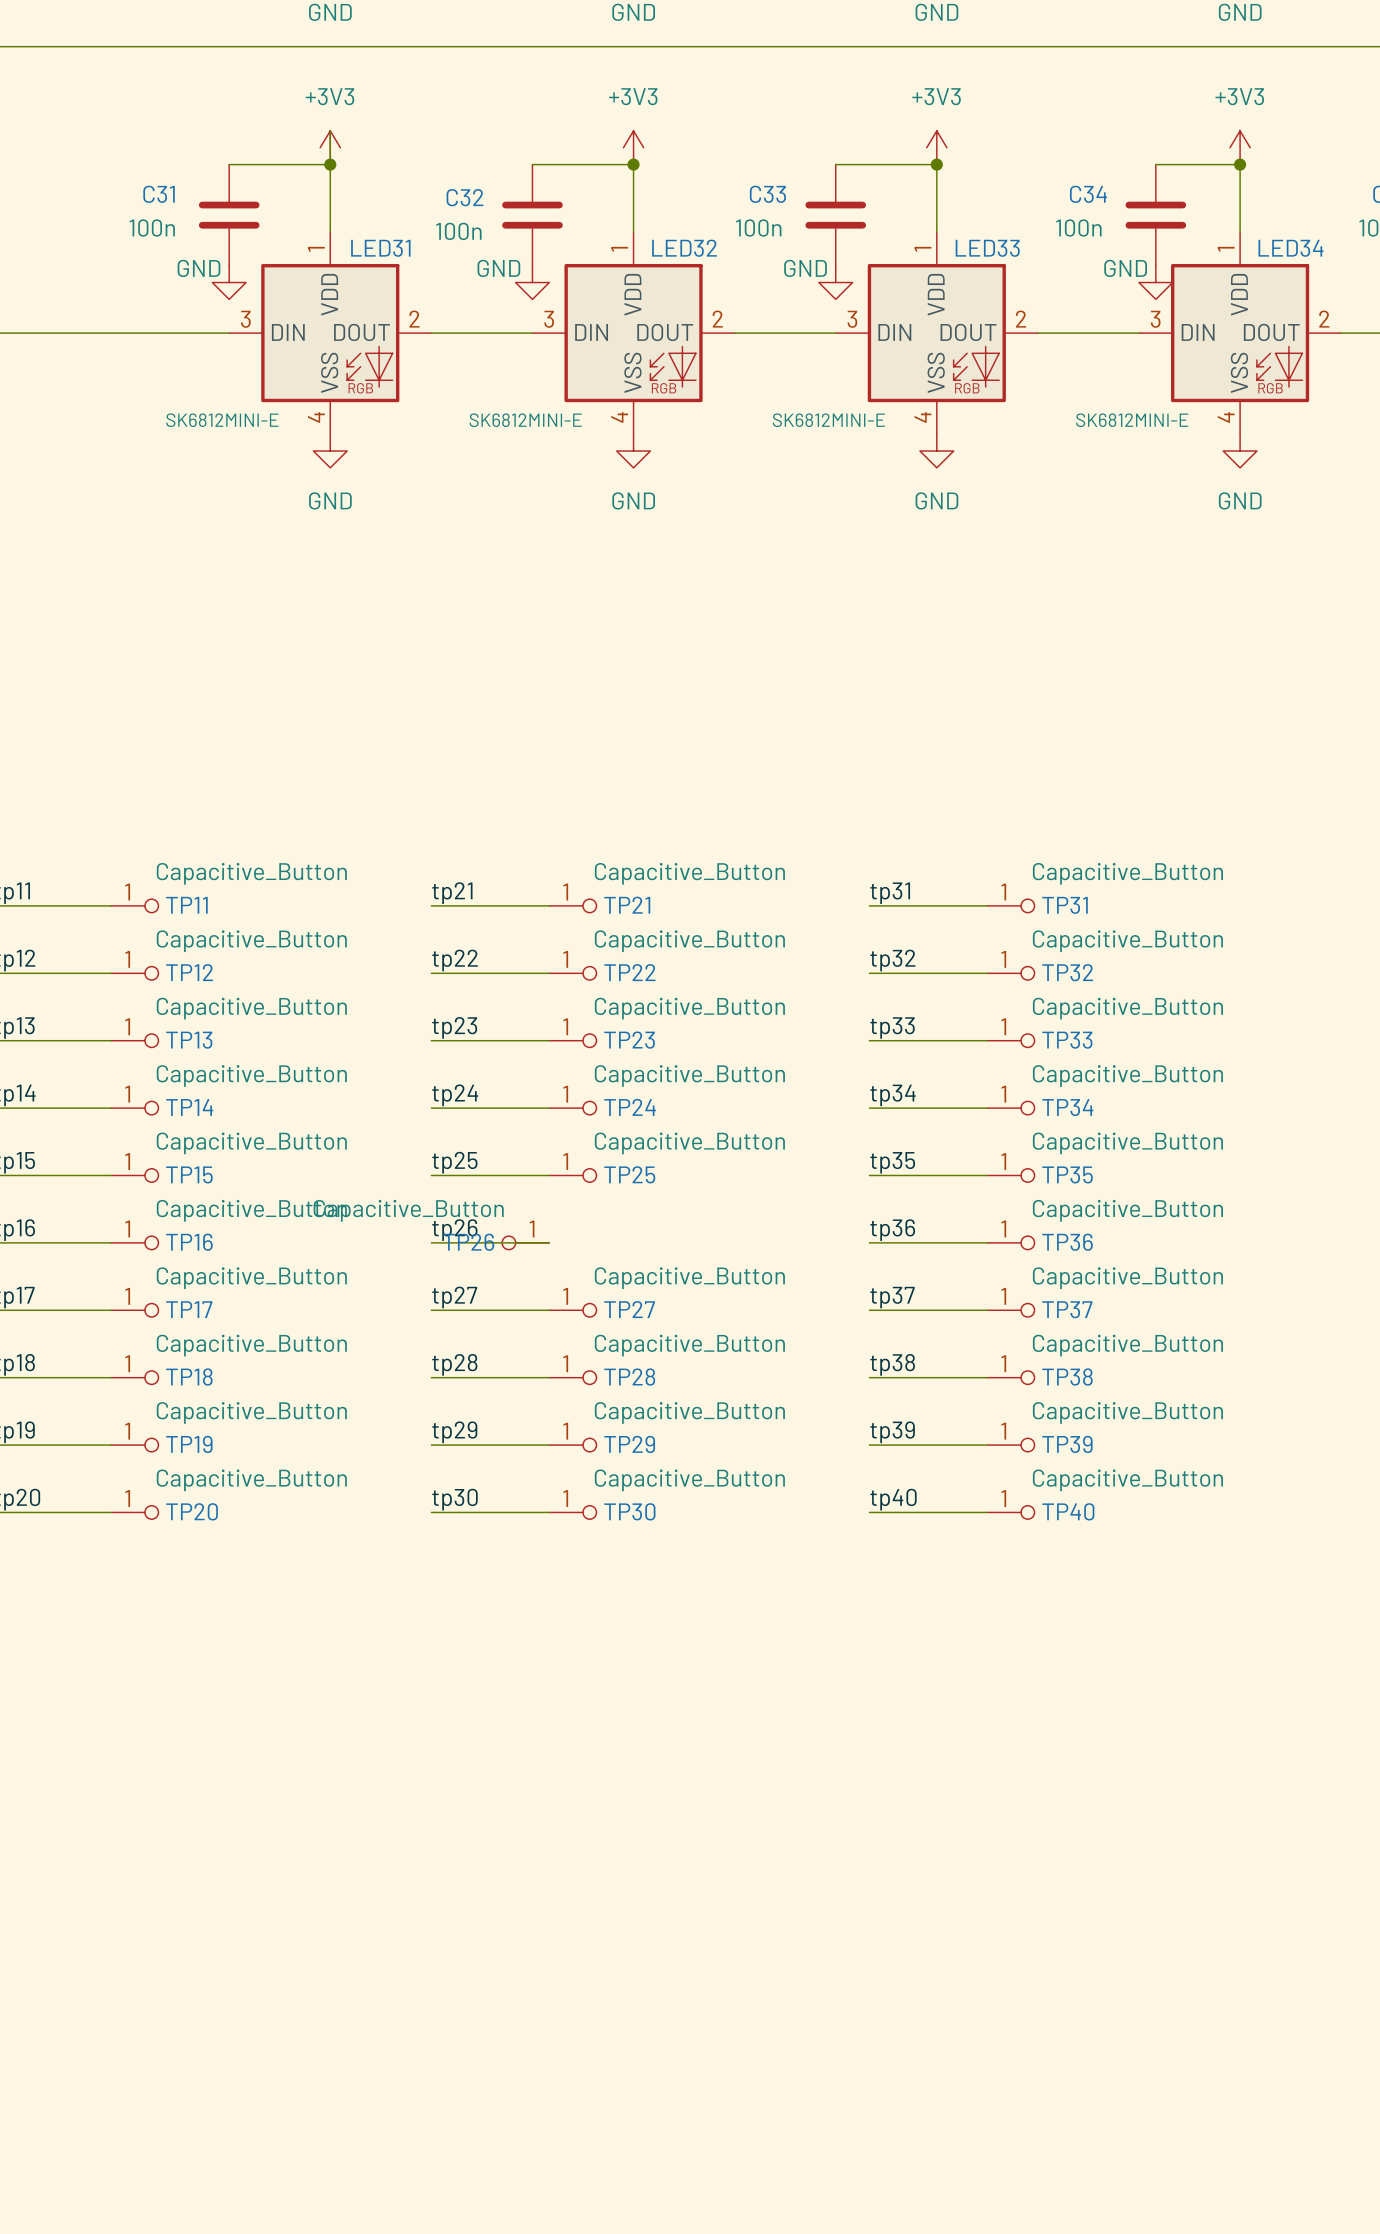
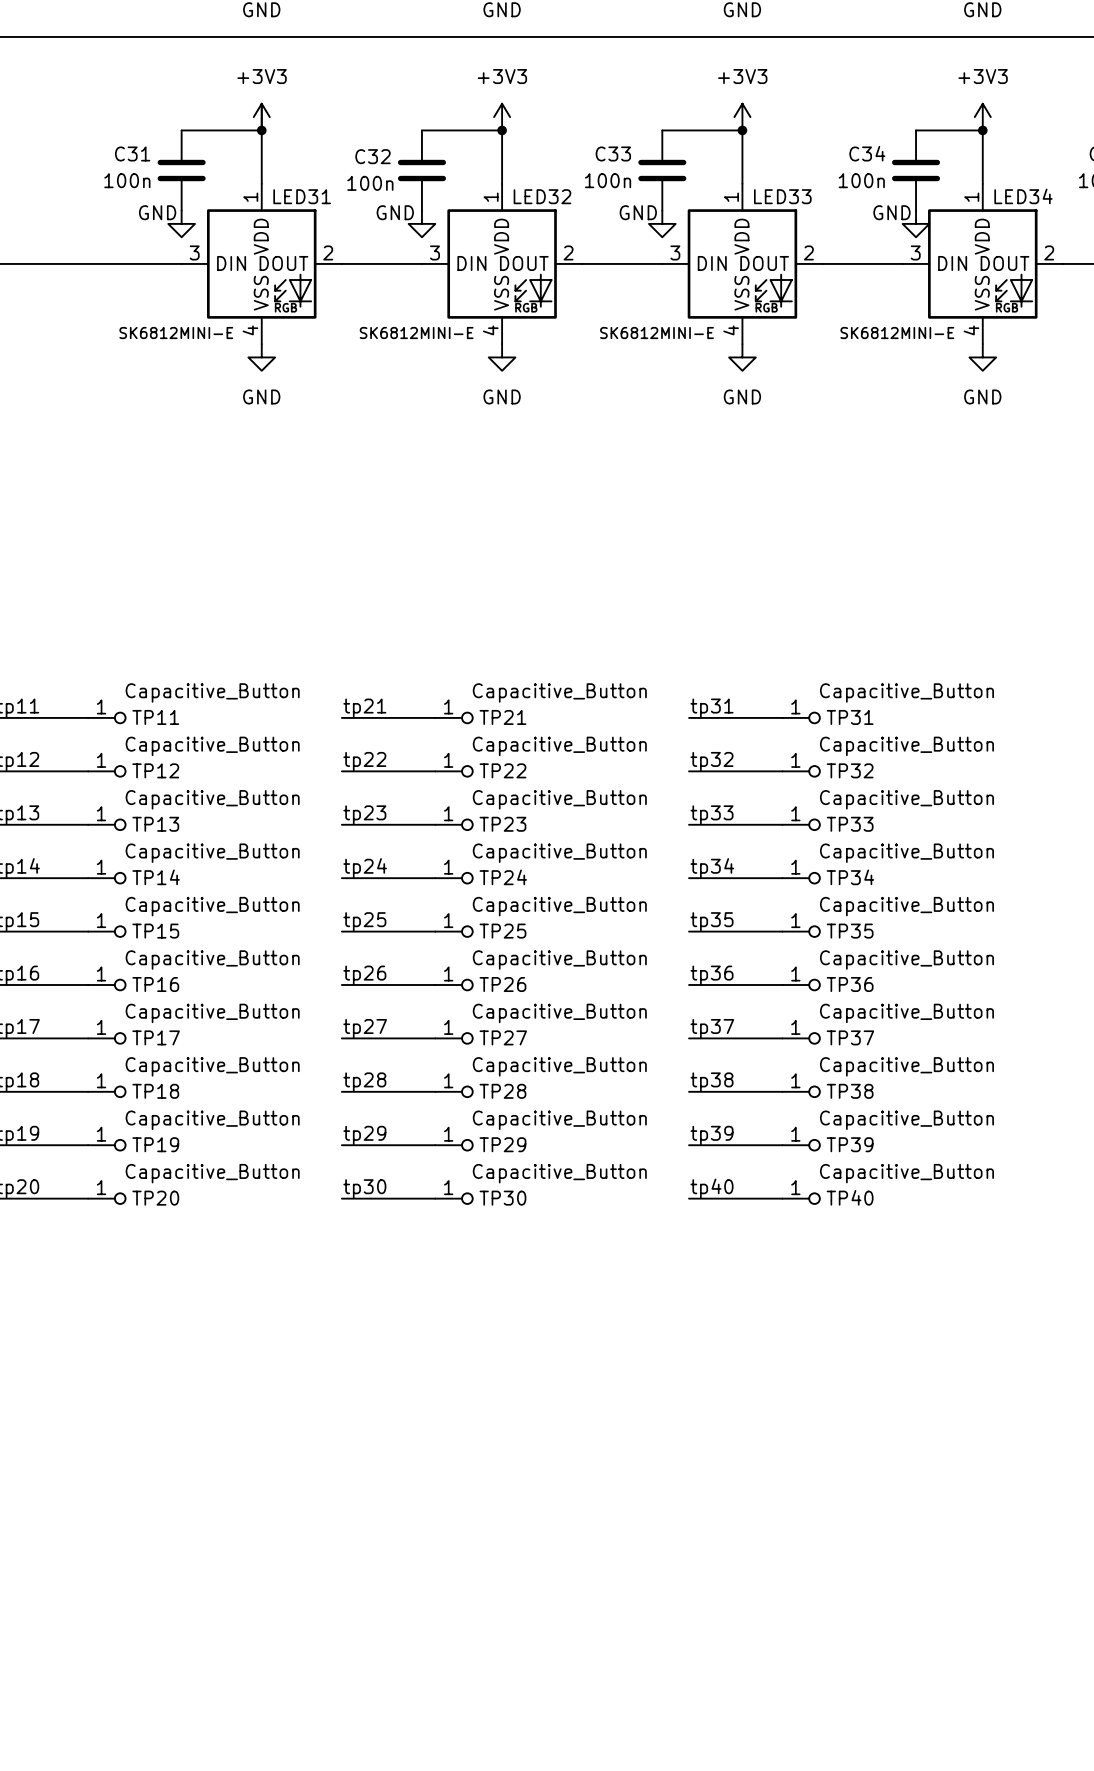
TP26 value position: Capacitive_Button (408, 1210) -> Capacitive_Button (559, 960)
TP26 rotation: 0° (508, 1242) -> 180° (467, 985)
TP26 position: (525, 1242) -> (454, 985)

